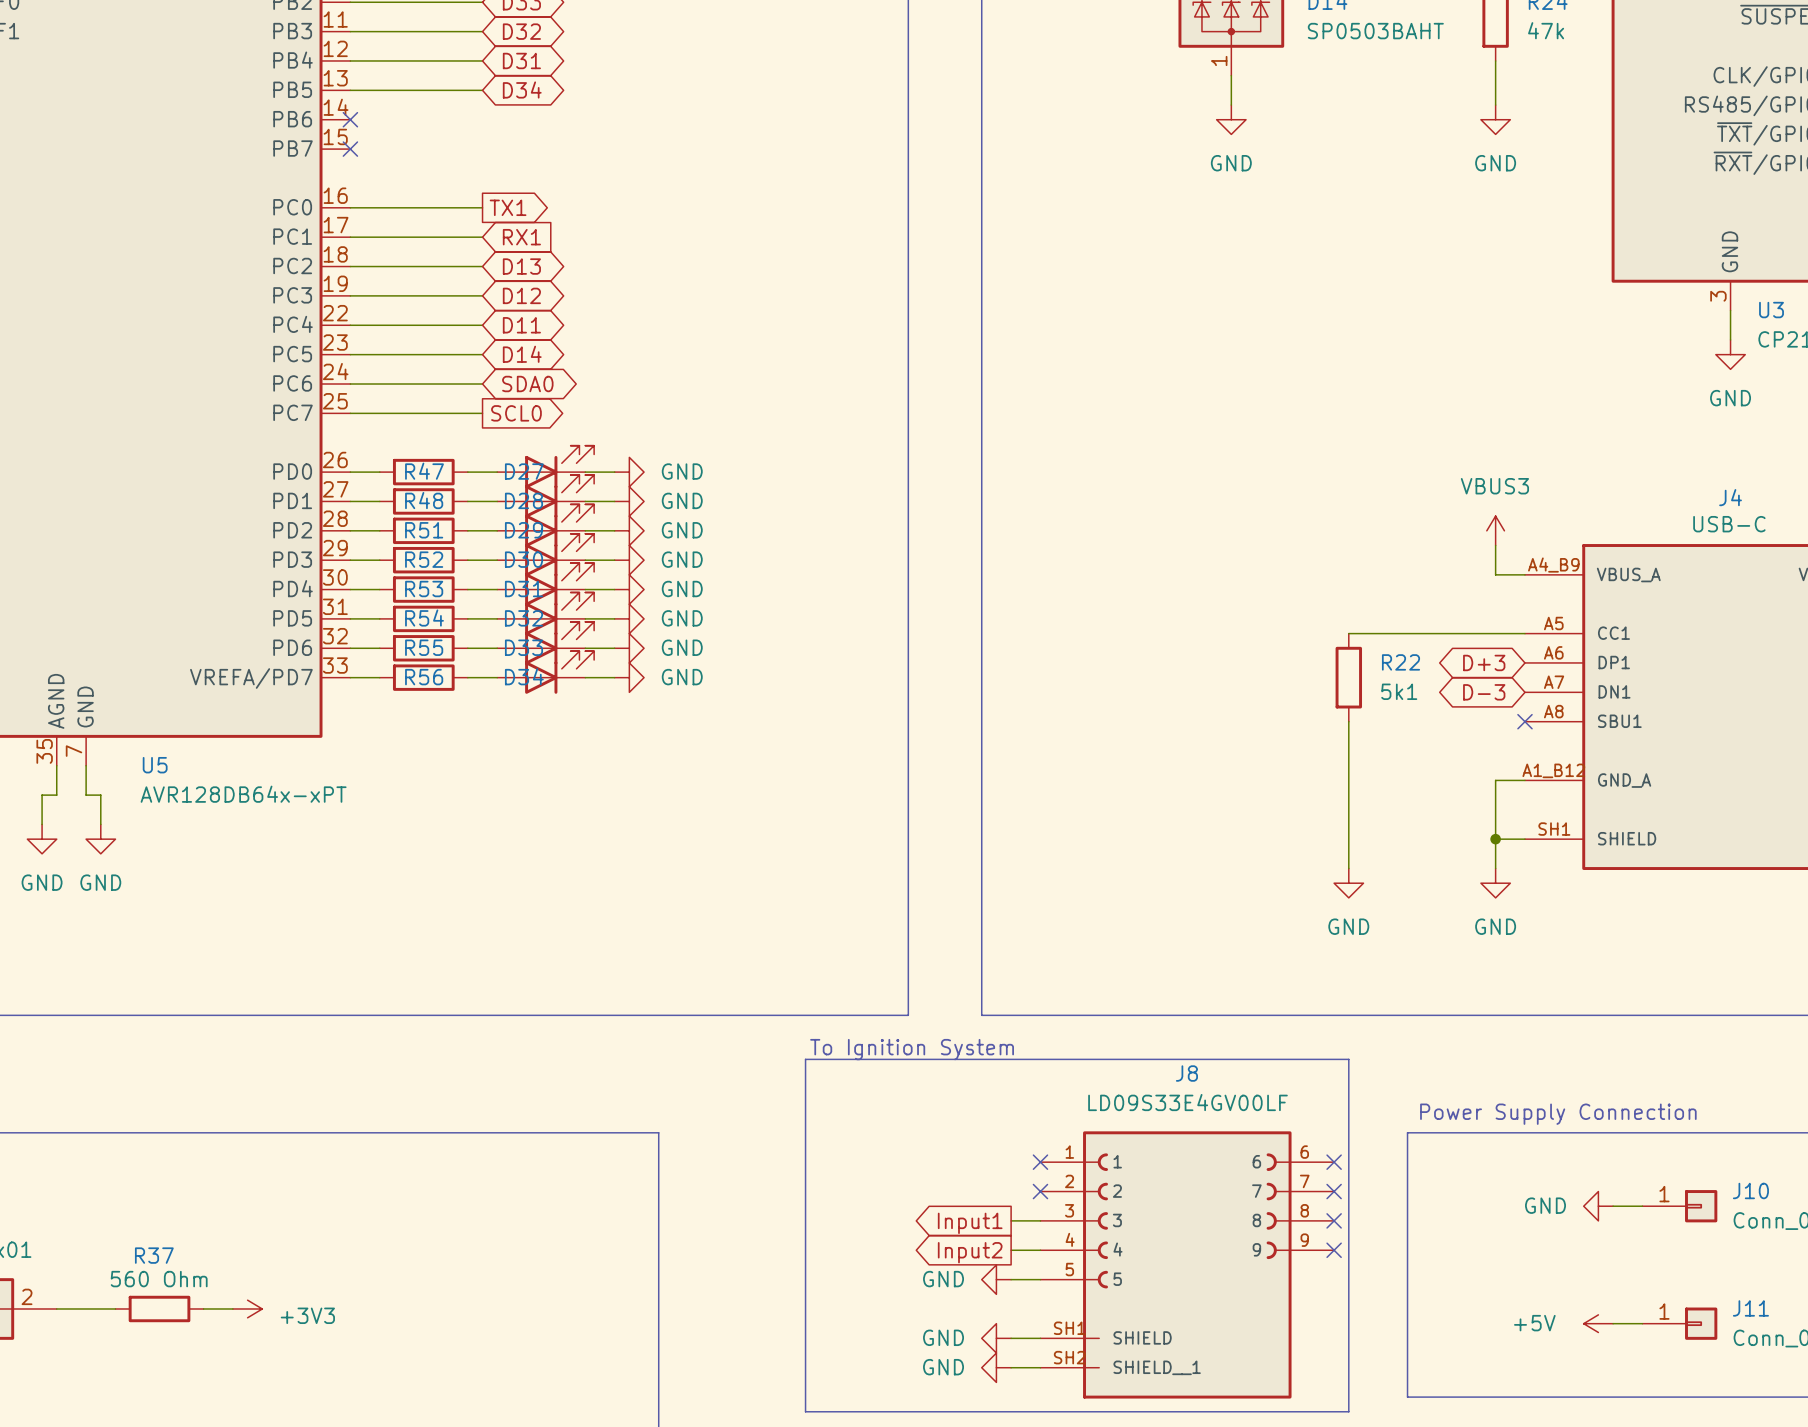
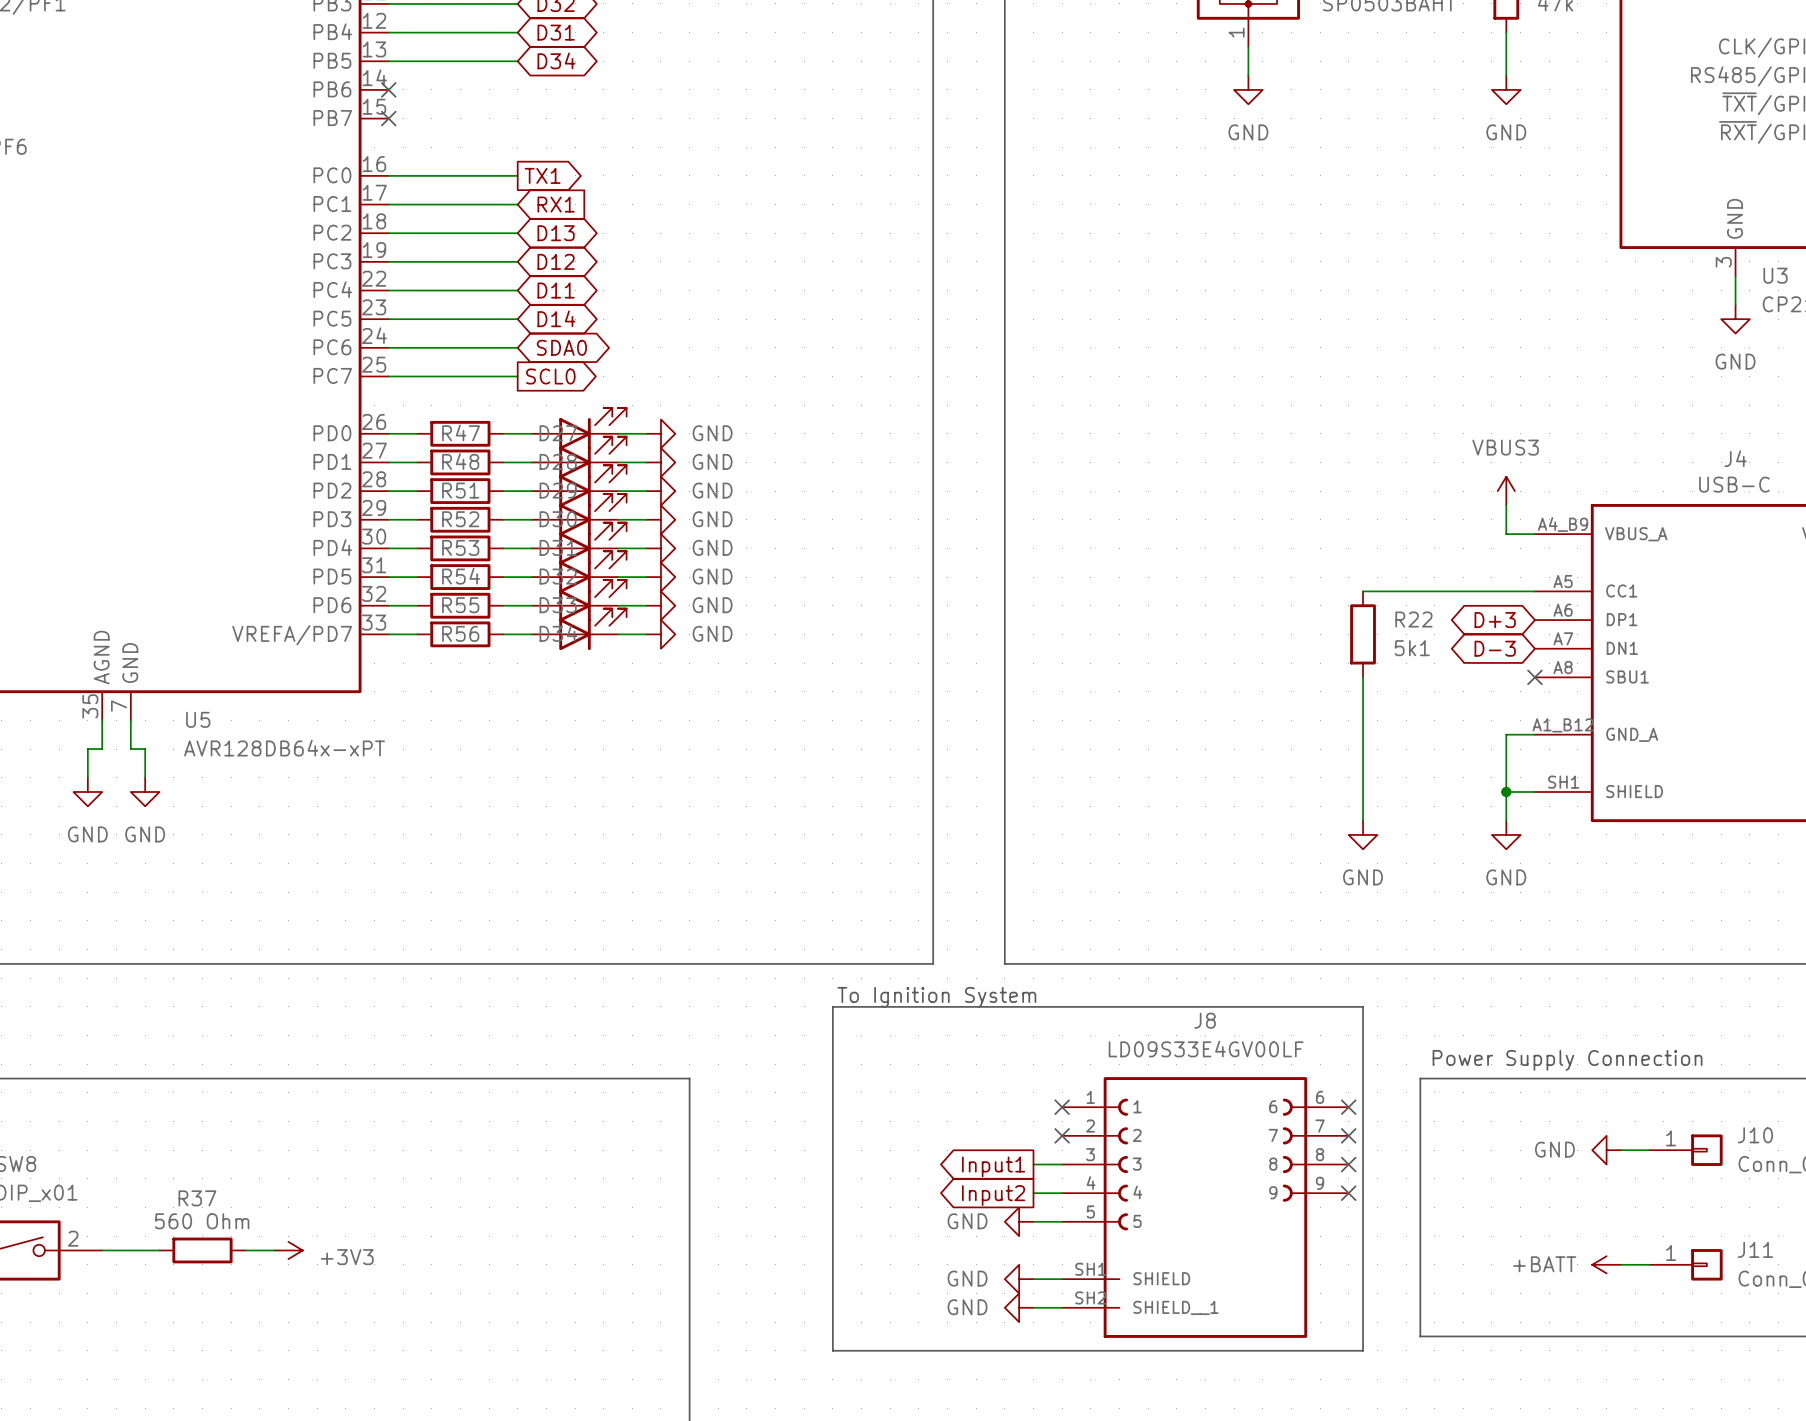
power symbol: +5V (1598, 1323) -> +BATT (1606, 1264)

